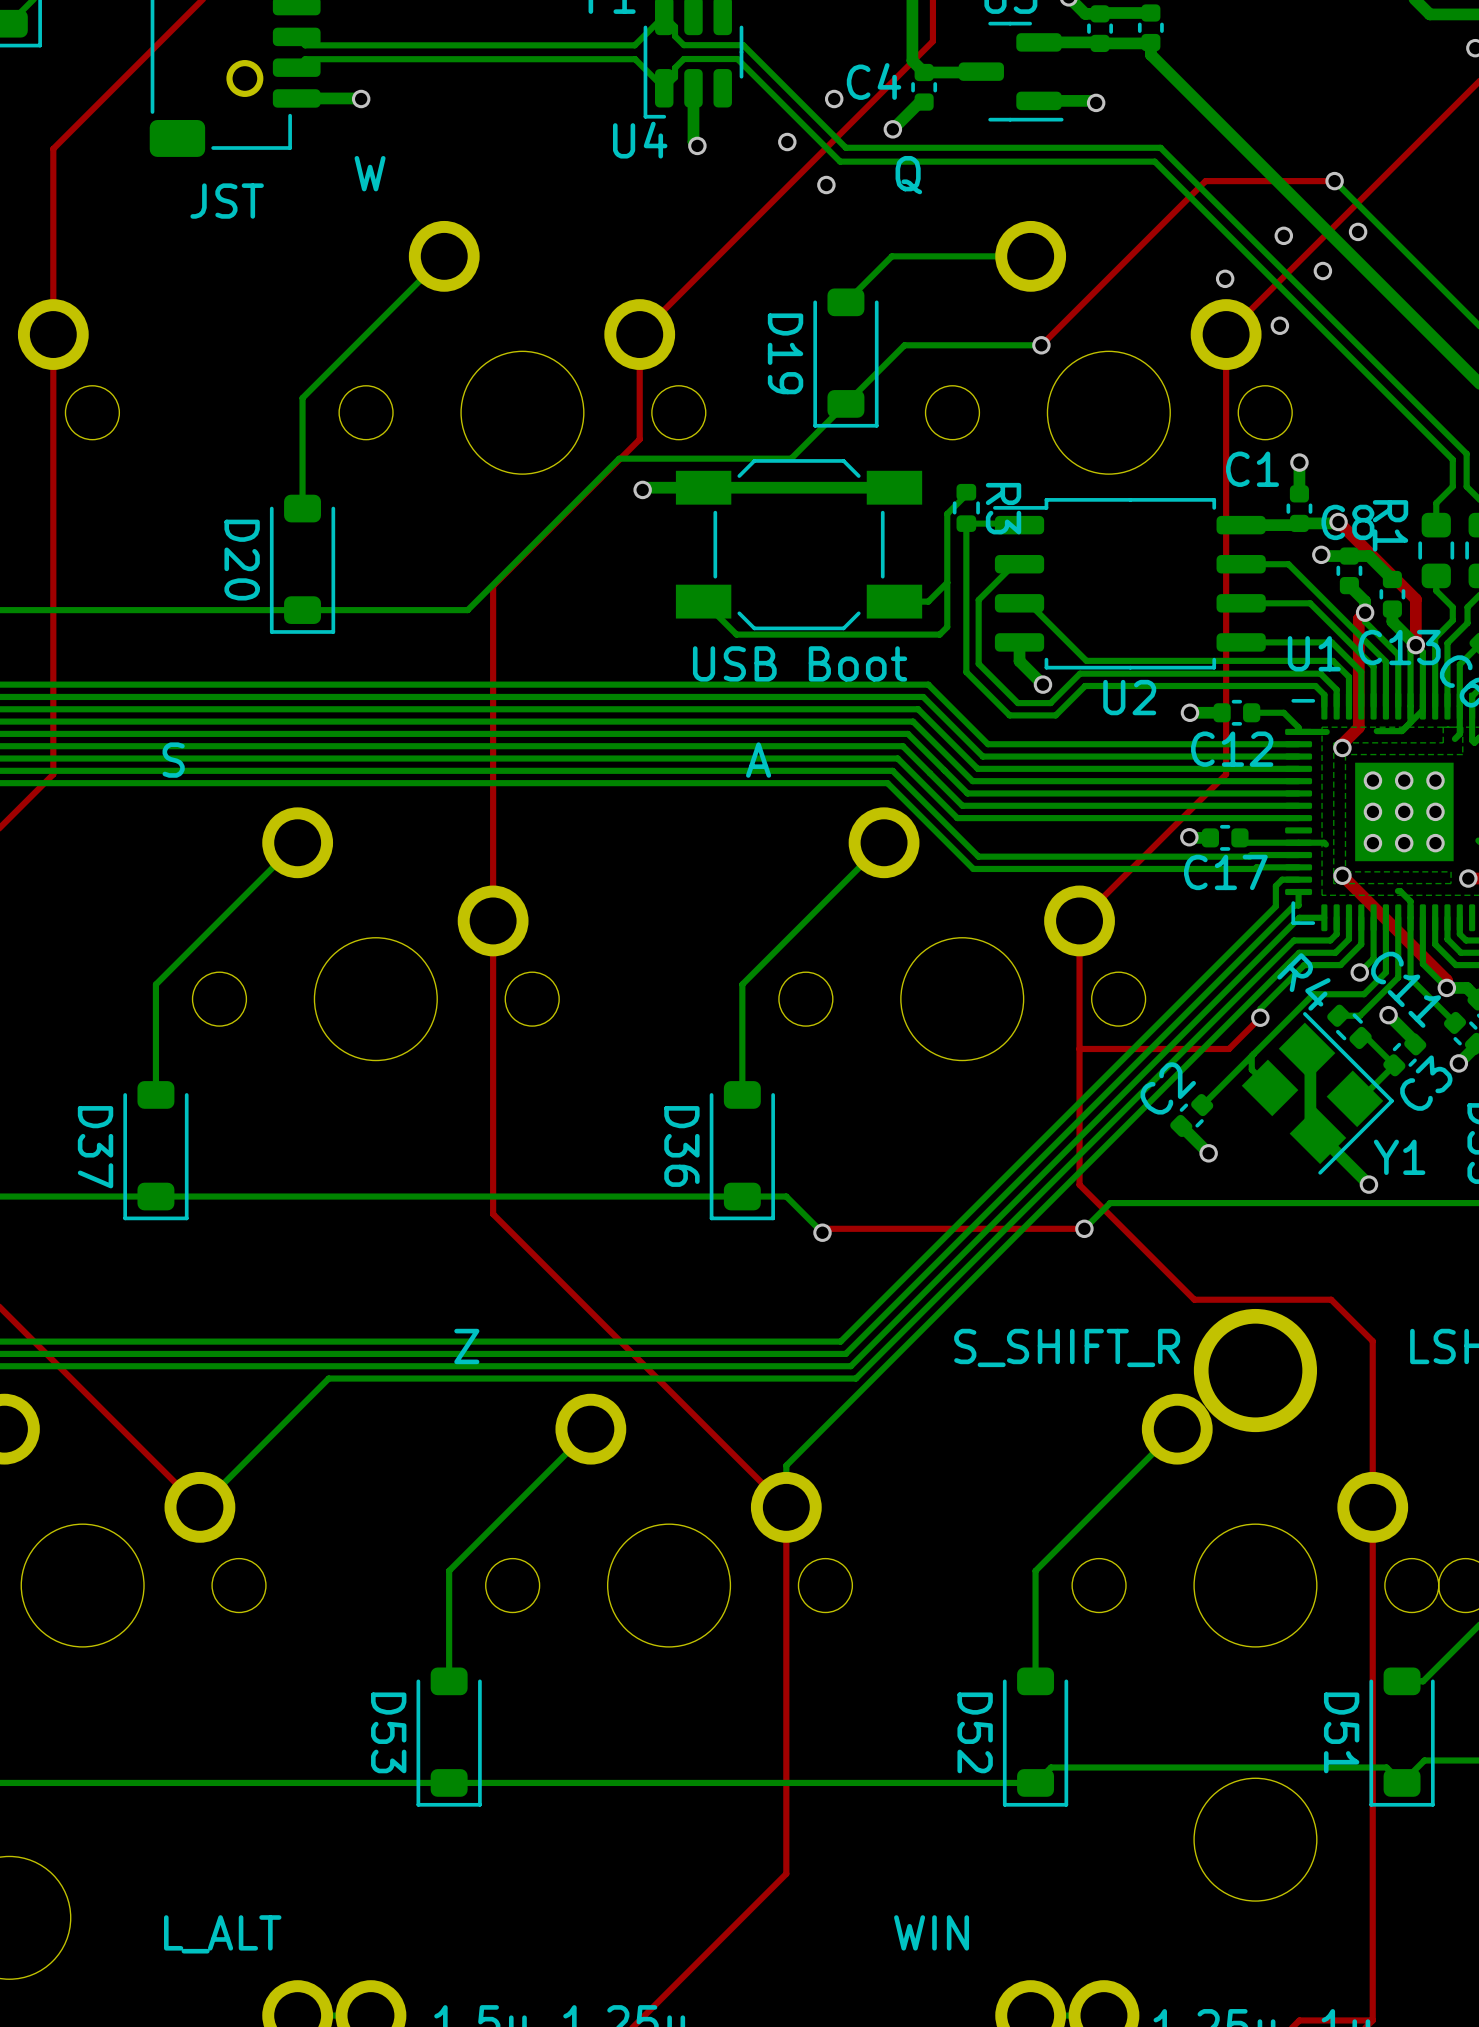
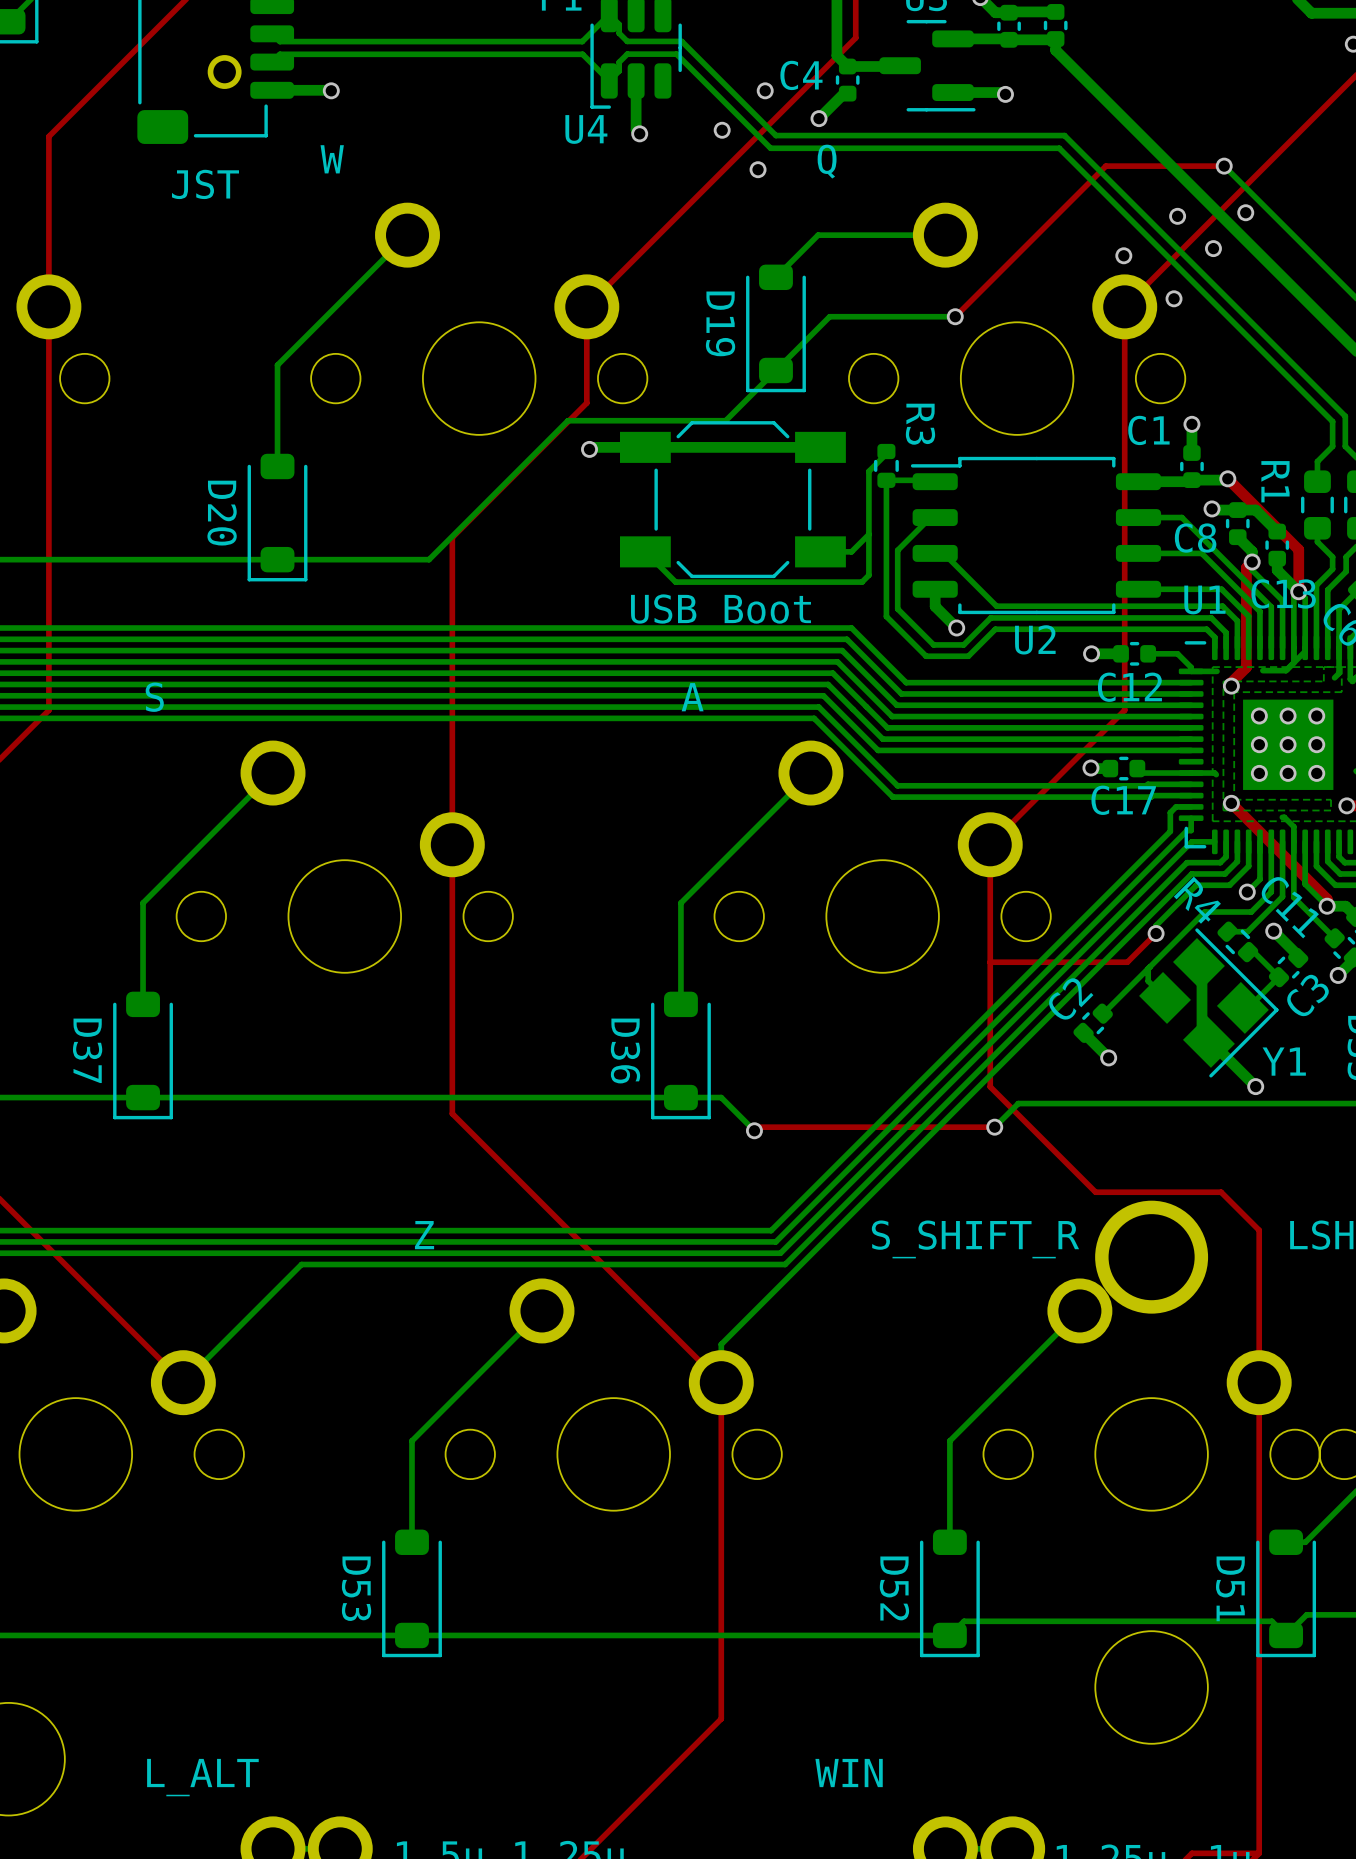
R3 name position: R3 (1003, 508) -> R3 (920, 424)
C8 name position: C8 (1347, 522) -> C8 (1195, 538)

